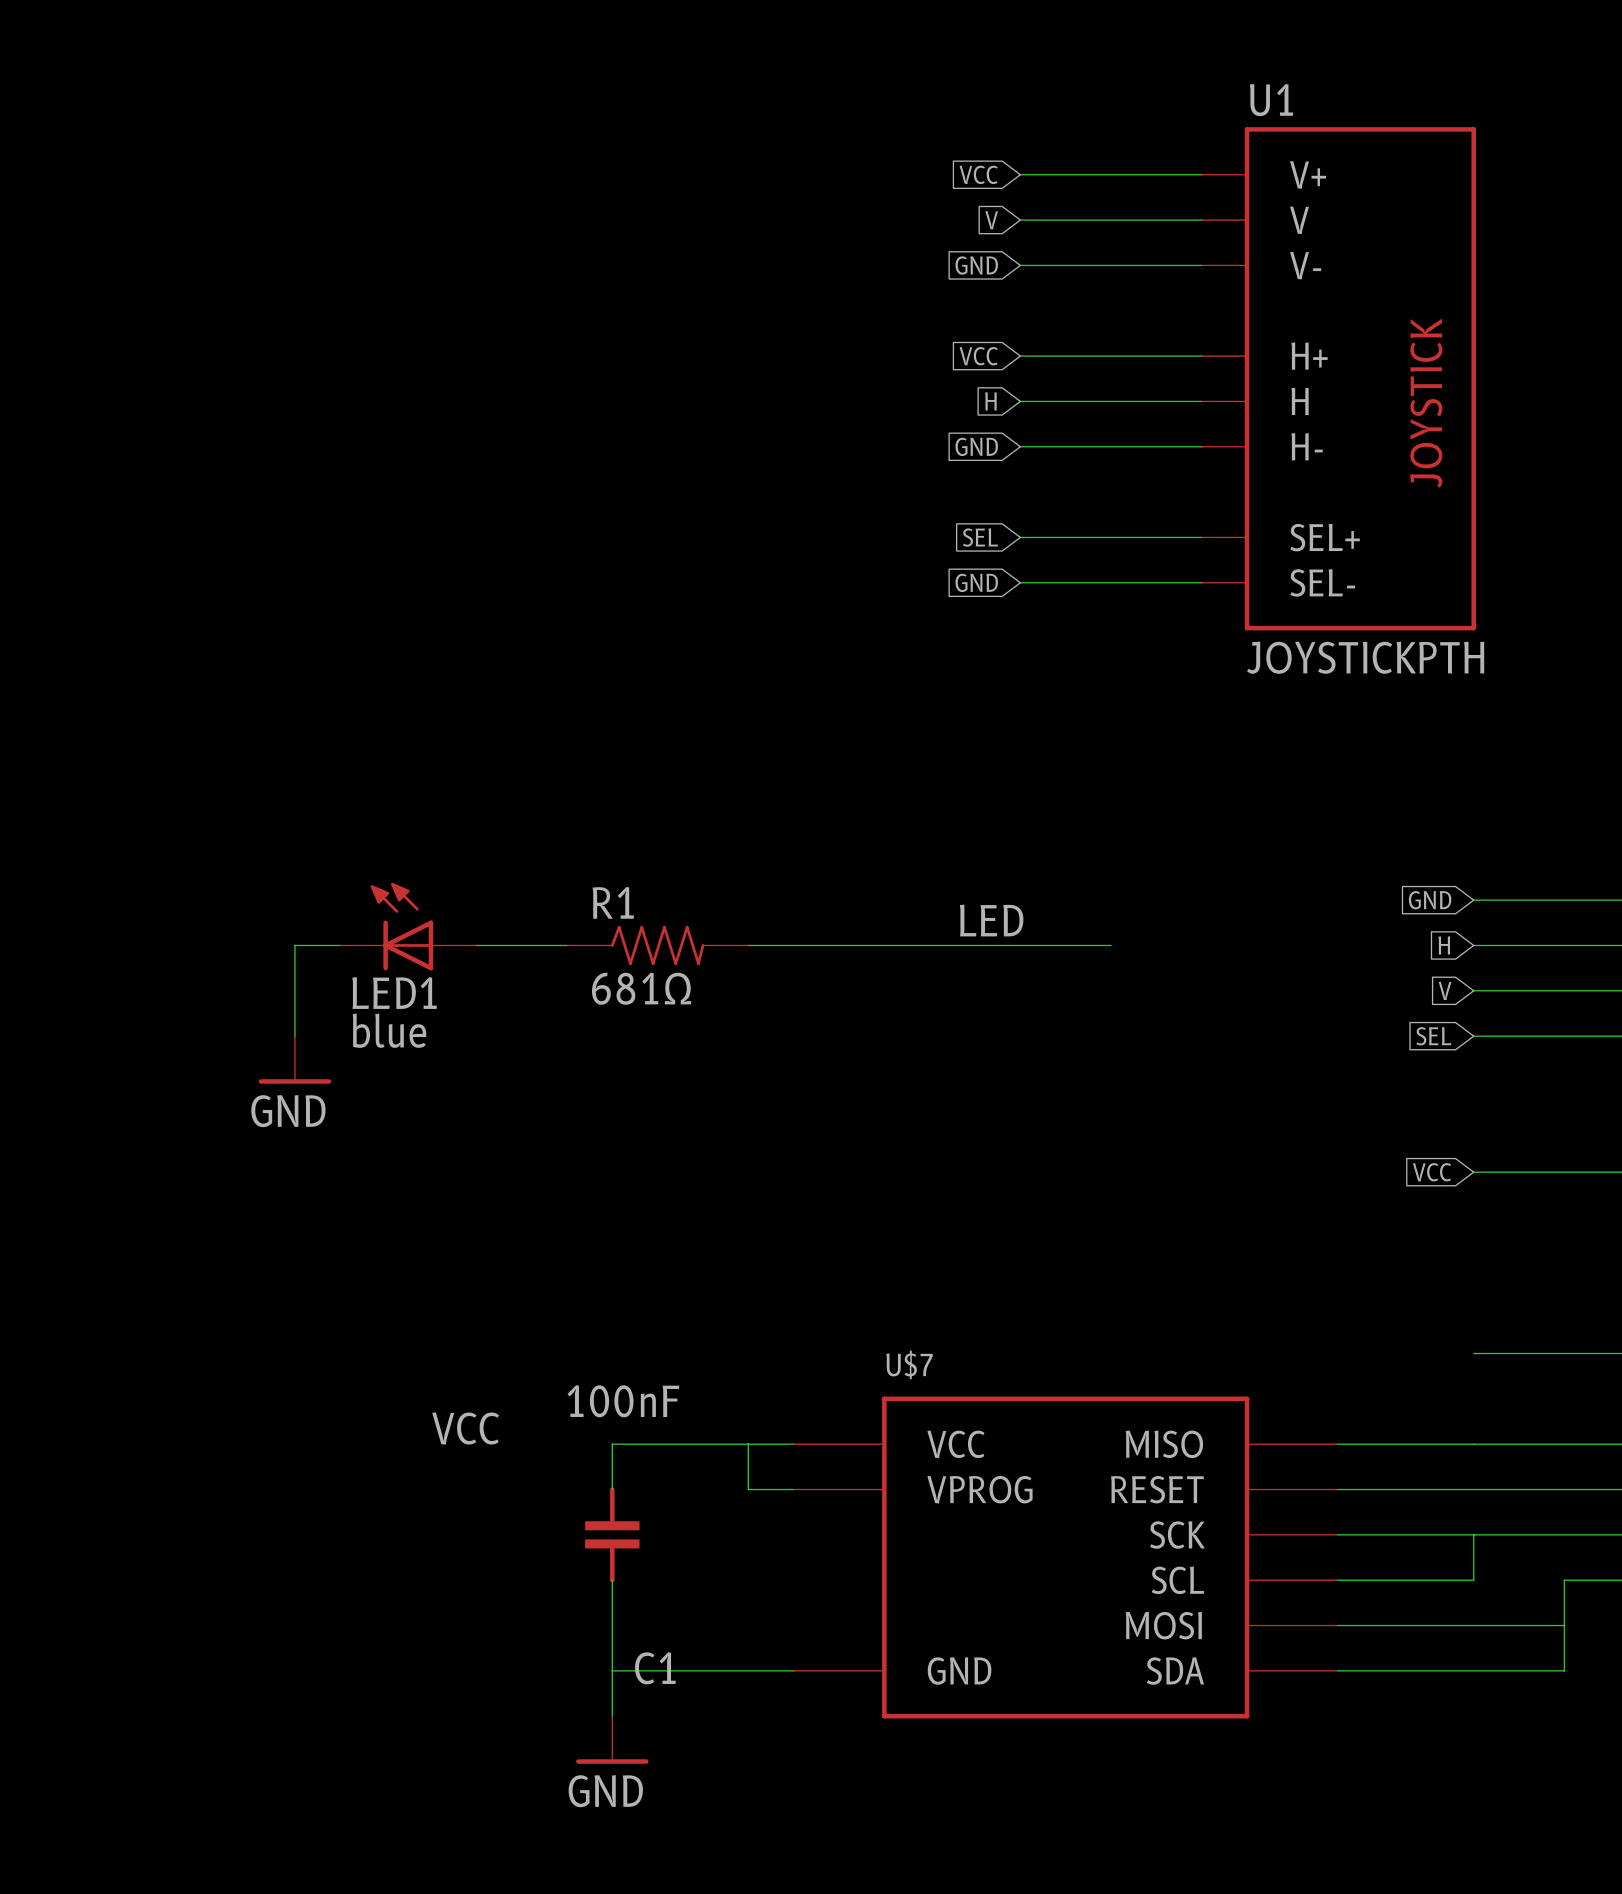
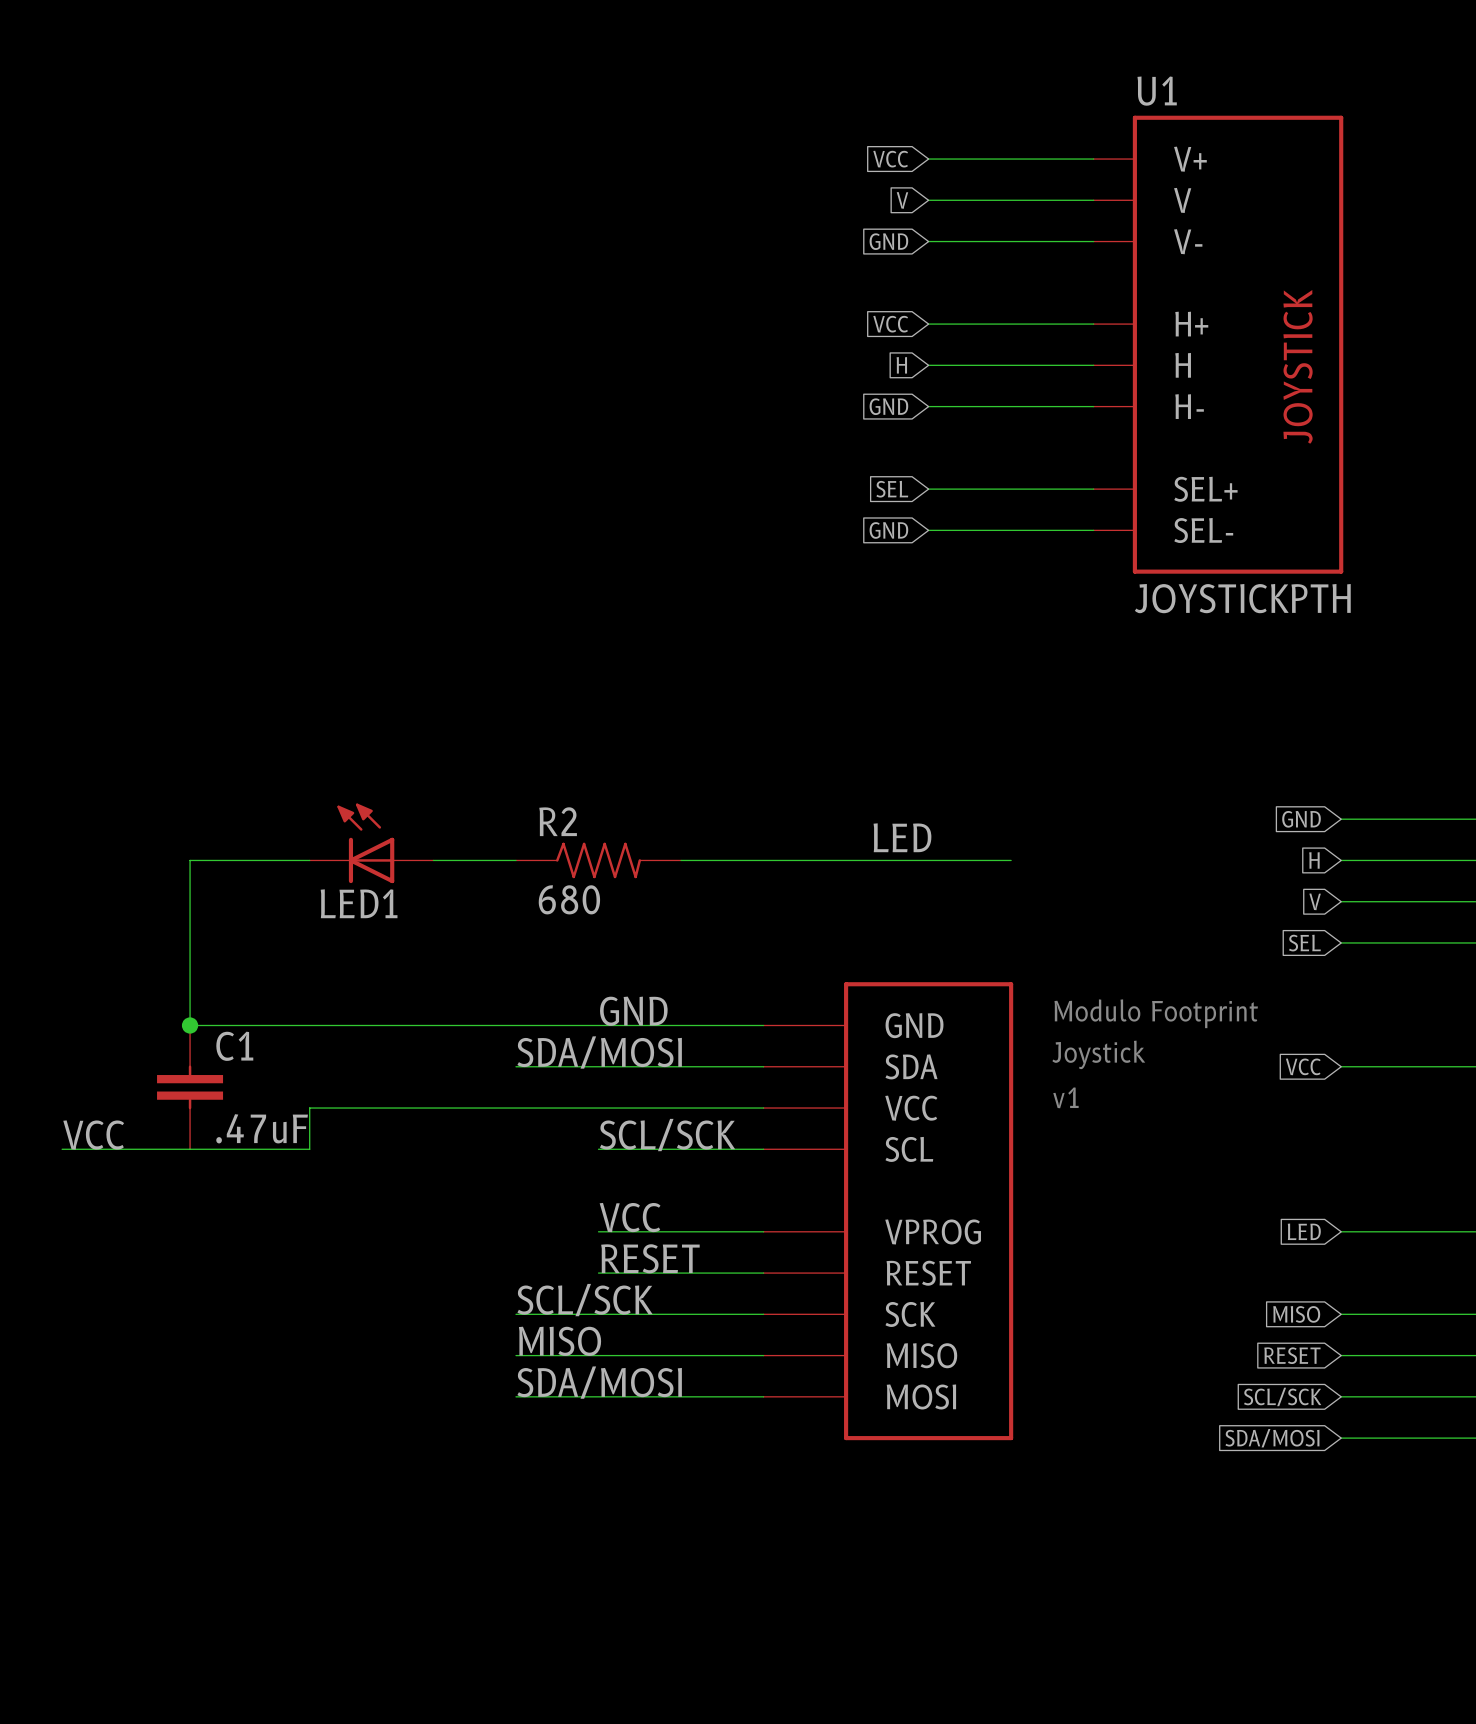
R1 name: R1 (613, 902) -> R2 (558, 821)
wire: (294, 945) (294, 1036) -> (268, 860) (190, 860) (190, 1025) (763, 1025)
R1 value: 681Ω (641, 988) -> 680 (569, 899)
LED1 value: blue (389, 1030) -> none
power symbol: GND (294, 1059) -> none
label: none -> GND (633, 1011)
junction: none -> (190, 1025)
label: none -> SDA/MOSI (599, 1052)
wire: none -> (516, 1066) (763, 1066)
wire: none -> (763, 1108) (309, 1108) (309, 1149) (62, 1149)
label: none -> VCC (93, 1135)
label: none -> SCL/SCK (667, 1135)
wire: none -> (598, 1149) (763, 1149)
part: none -> (888, 1211)
label: none -> VCC (630, 1217)
wire: none -> (598, 1231) (763, 1231)
global label: none -> LED (1304, 1231)
label: none -> RESET (650, 1258)
C1 value: 100nF (623, 1401) -> .47uF (262, 1128)
label: VCC (465, 1428) -> none
label: none -> SCL/SCK (585, 1300)
wire: (612, 1444) (612, 1489) -> (557, 1314) (516, 1314)
wire: (748, 1444) (748, 1489) -> (516, 1355) (681, 1355)
wire: (1337, 1444) (1473, 1444) -> none
global label: none -> MISO (1296, 1314)
label: none -> MISO (560, 1341)
C1 symbol: [585, 1487, 640, 1583] -> [157, 1025, 224, 1150]
wire: (1337, 1489) (1473, 1489) -> none
global label: none -> RESET (1292, 1355)
label: none -> SDA/MOSI (599, 1382)
wire: none -> (516, 1396) (763, 1396)
wire: (1337, 1534) (1473, 1534) (1473, 1580) (1337, 1580) -> none
global label: none -> SCL/SCK (1282, 1396)
U$7: (1065, 1557) -> none
wire: (612, 1580) (612, 1716) -> none
global label: none -> SDA/MOSI (1272, 1438)
wire: (1564, 1580) (1564, 1670) (1337, 1670) -> (1423, 1438) (1341, 1438)
wire: (1337, 1625) (1564, 1625) -> none
C1 name position: C1 (655, 1668) -> C1 (234, 1046)
wire: (612, 1670) (793, 1670) -> (598, 1273) (763, 1273)
power symbol: GND (612, 1740) -> none

